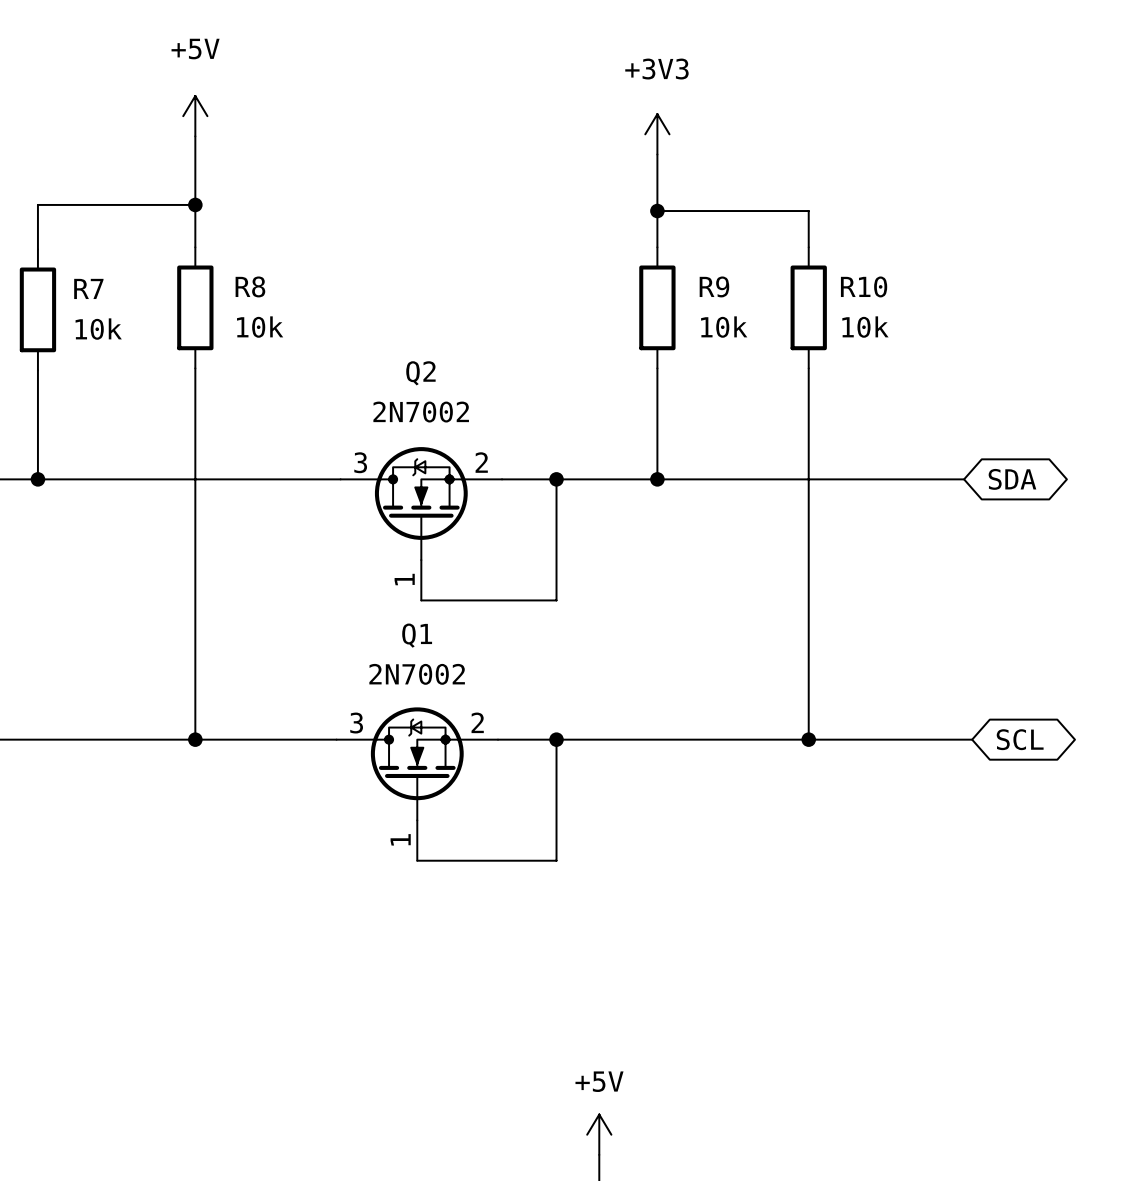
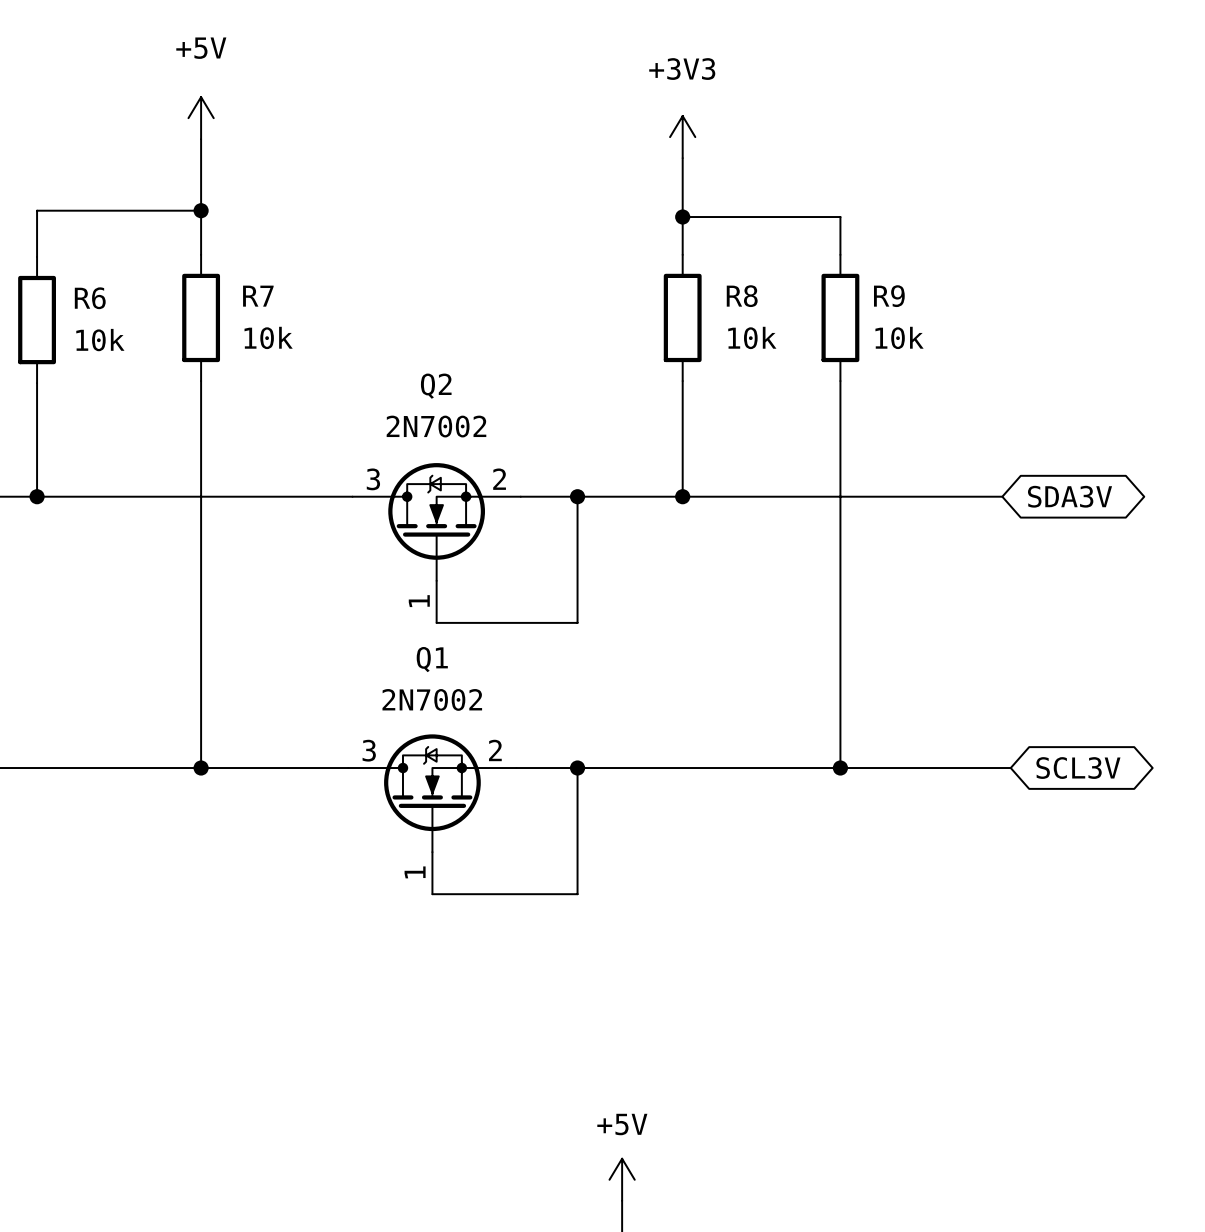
R8 name: R8 (250, 286) -> R7 (258, 296)
R9 name: R9 (714, 286) -> R8 (742, 296)
R10 name: R10 (864, 286) -> R9 (889, 296)
R7 name: R7 (88, 288) -> R6 (90, 298)
global label: SDA (1012, 479) -> SDA3V (1070, 496)
global label: SCL (1020, 739) -> SCL3V (1078, 768)

